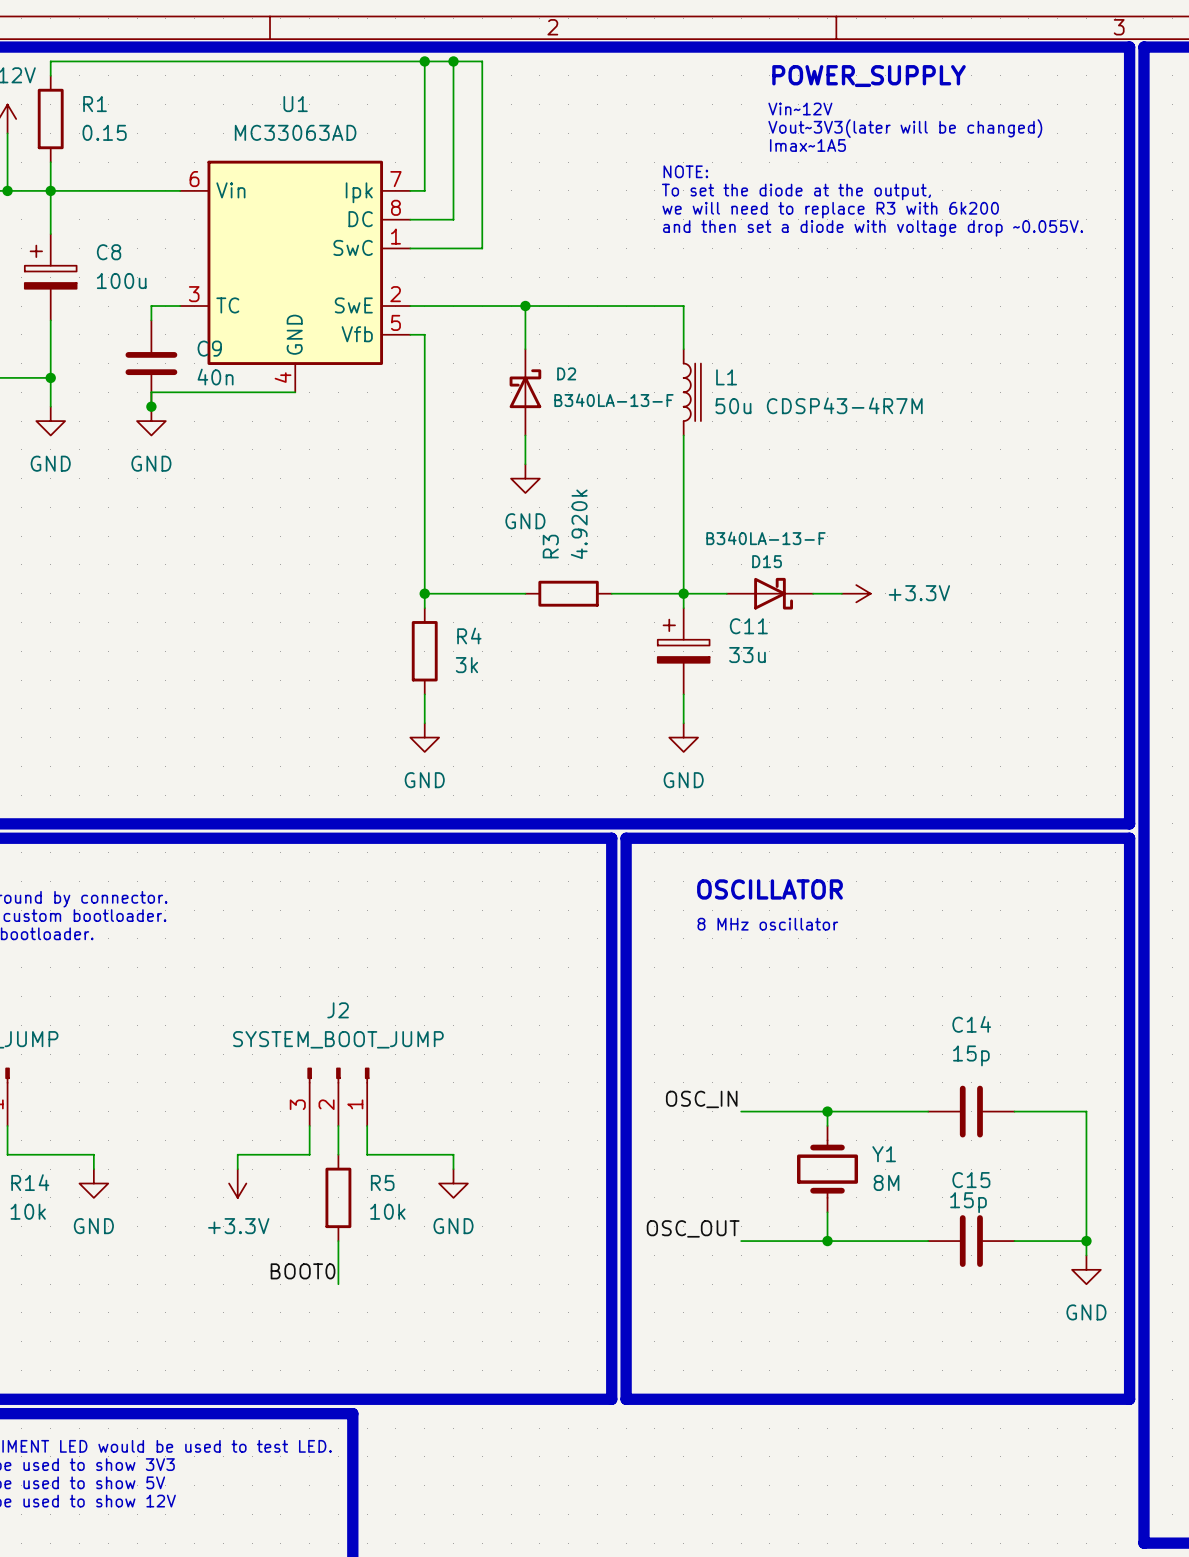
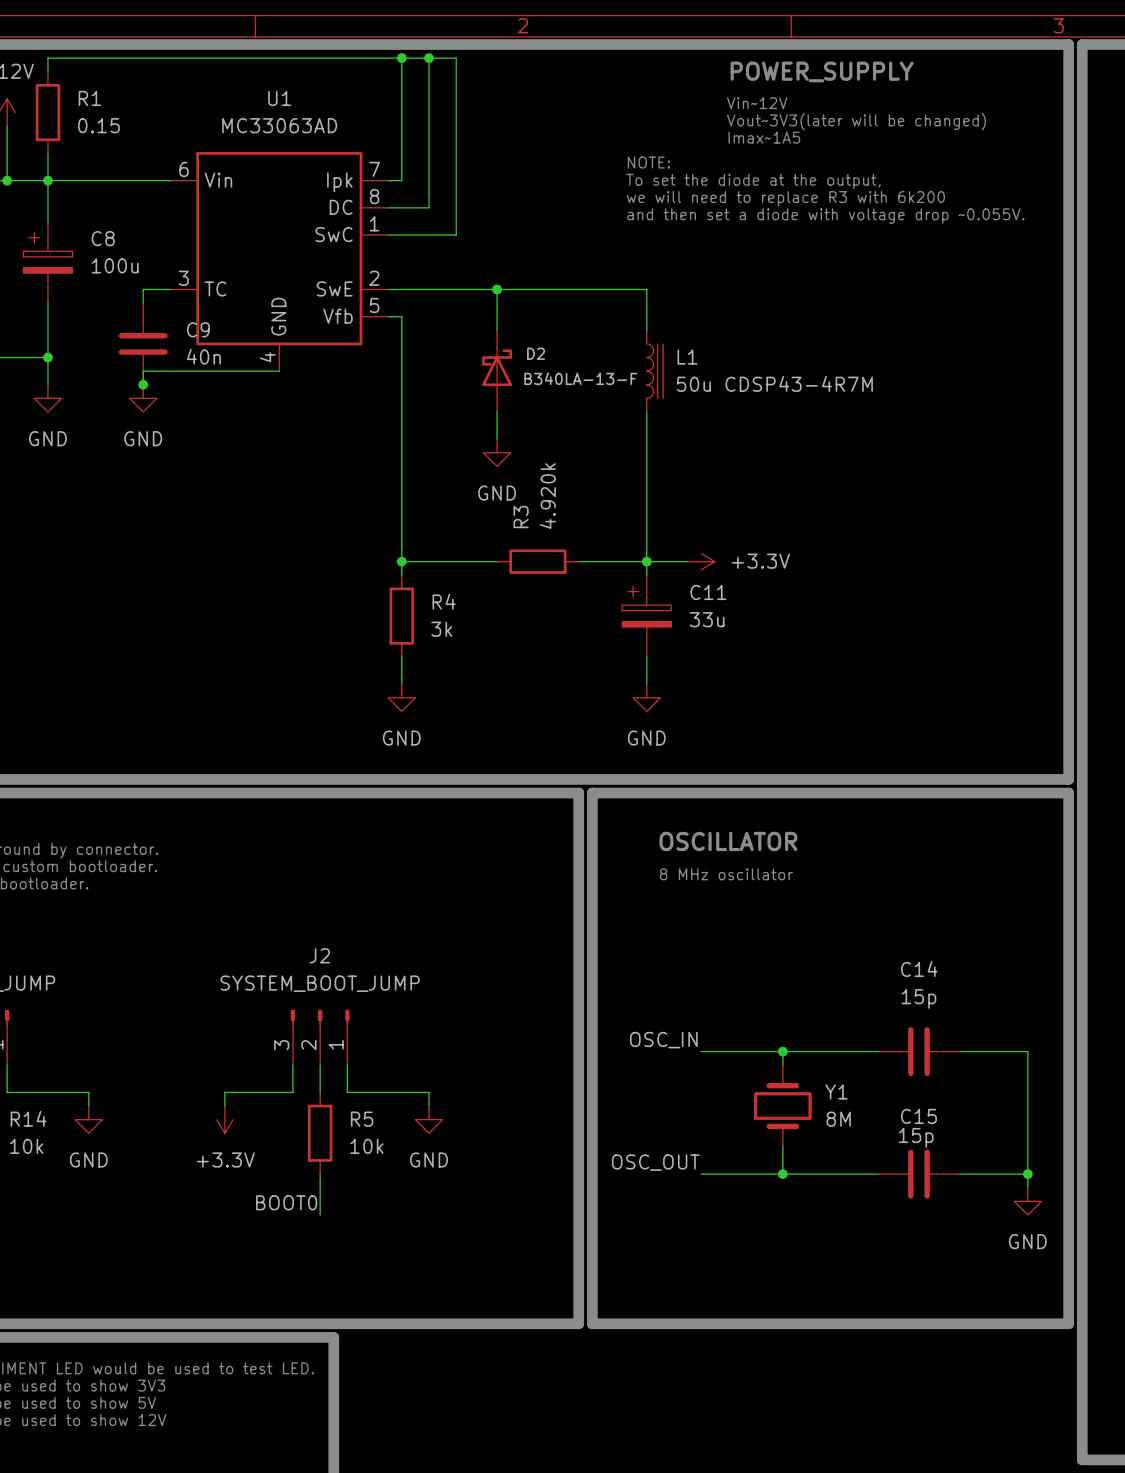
D15: B340LA-13-F (769, 593) -> none
wire: (813, 593) (841, 593) -> none
power symbol position: +3.3V (856, 593) -> +3.3V (701, 561)

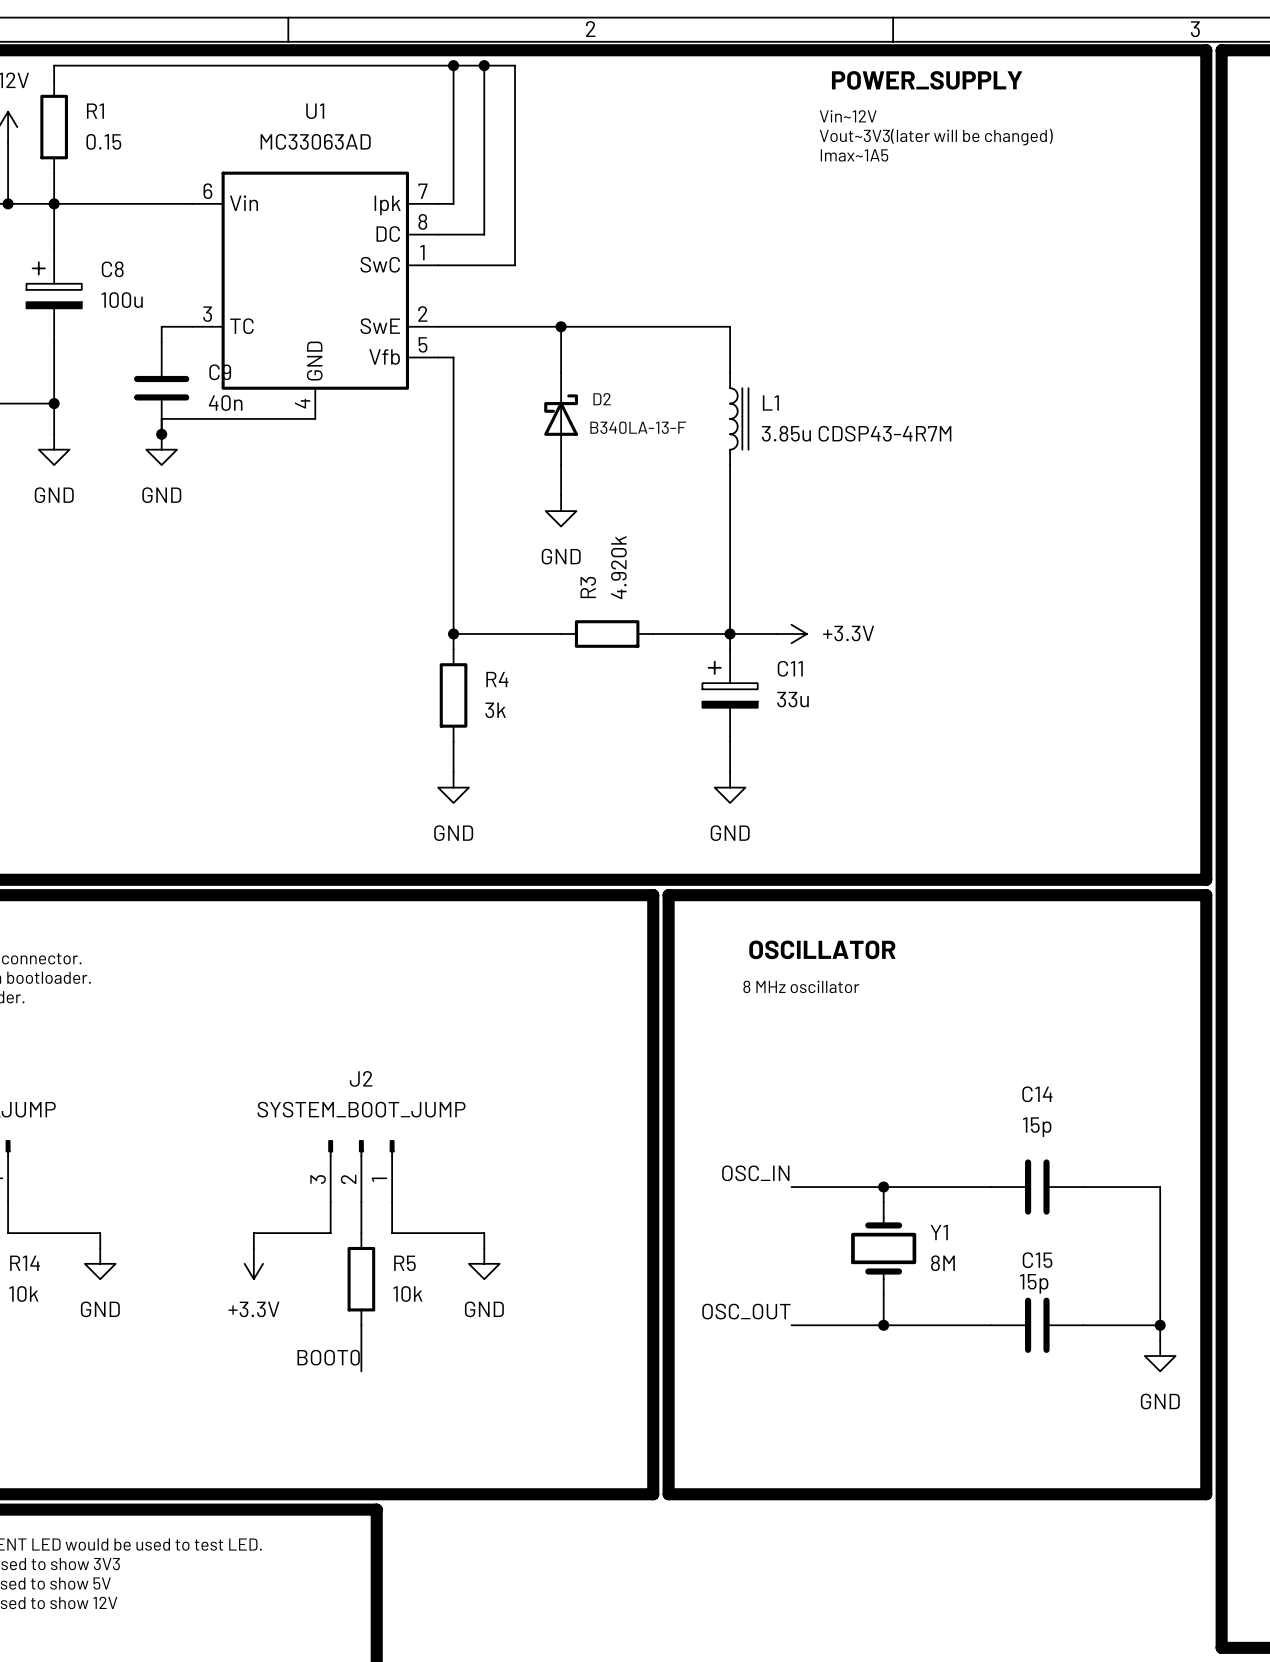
text: NOTE: (648, 162) -> none
text: To set the diode at the output, (753, 181) -> none
text: we will need to replace R3 with 6k200 (785, 198) -> none
text: and then set a diode with voltage drop ~0.055V. (825, 216) -> none
L1 value: 50u CDSP43-4R7M (774, 383) -> 3.85u CDSP43-4R7M (856, 433)

